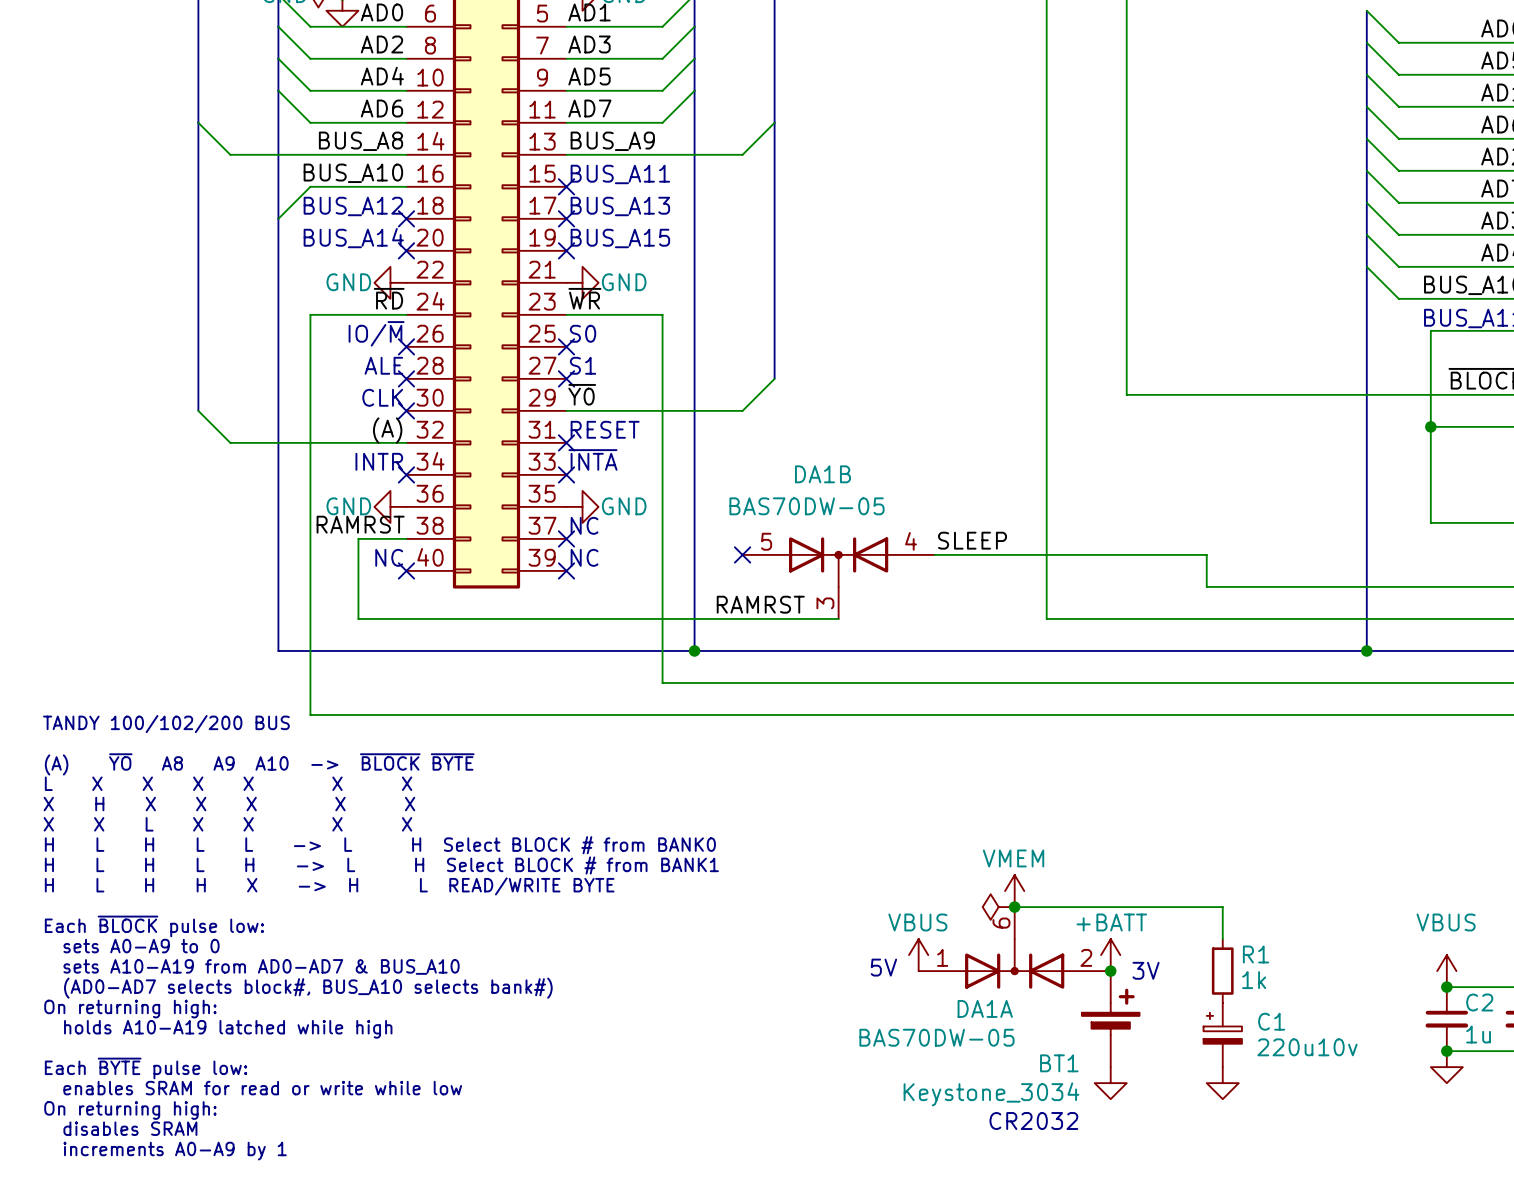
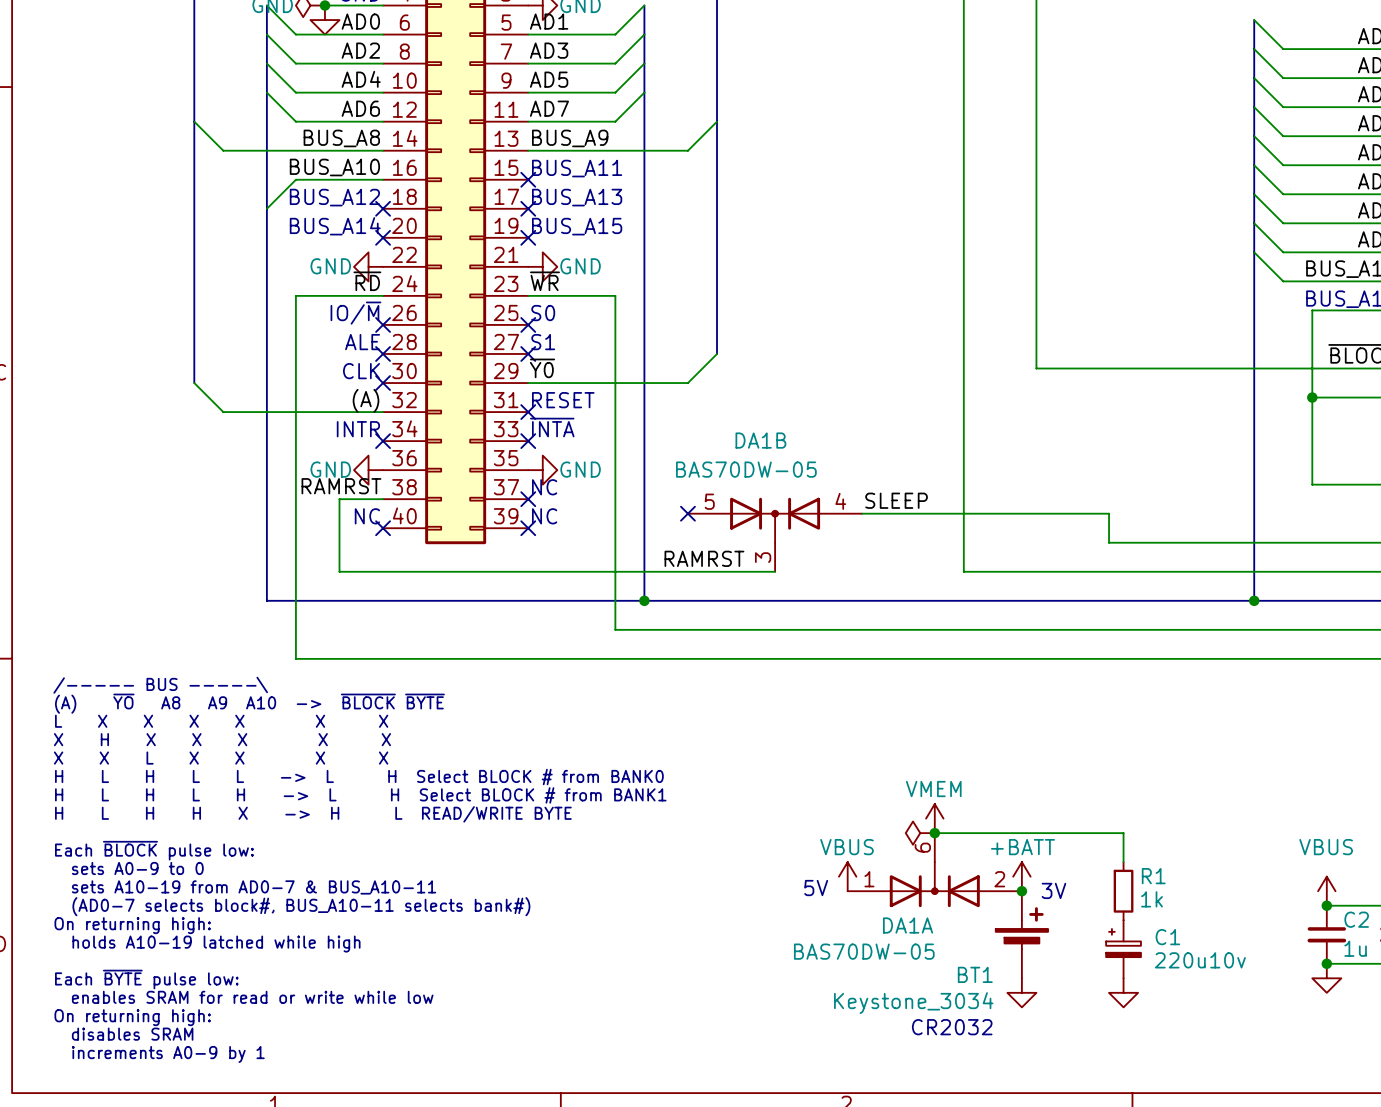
text: TANDY 100/102/200 BUS (166, 724) -> none
text: none -> /----- BUS -----\ (160, 685)
text: sets A0-A9 to 0 (141, 946) -> sets A0-9 to 0 (137, 868)
text: sets A10-A19 from AD0-AD7 & BUS_A10 (261, 966) -> sets A10-19 from AD0-7 & BUS_A10-11 (254, 887)
text: (AD0-AD7 selects block#, BUS_A10 selects bank#) (308, 988) -> (AD0-7 selects block#, BUS_A10-11 selects bank#) (301, 906)
text: holds A10-A19 latched while high (228, 1029) -> holds A10-19 latched while high (216, 944)
text: increments A0-A9 by 1 (175, 1151) -> increments A0-9 by 1 (168, 1054)

